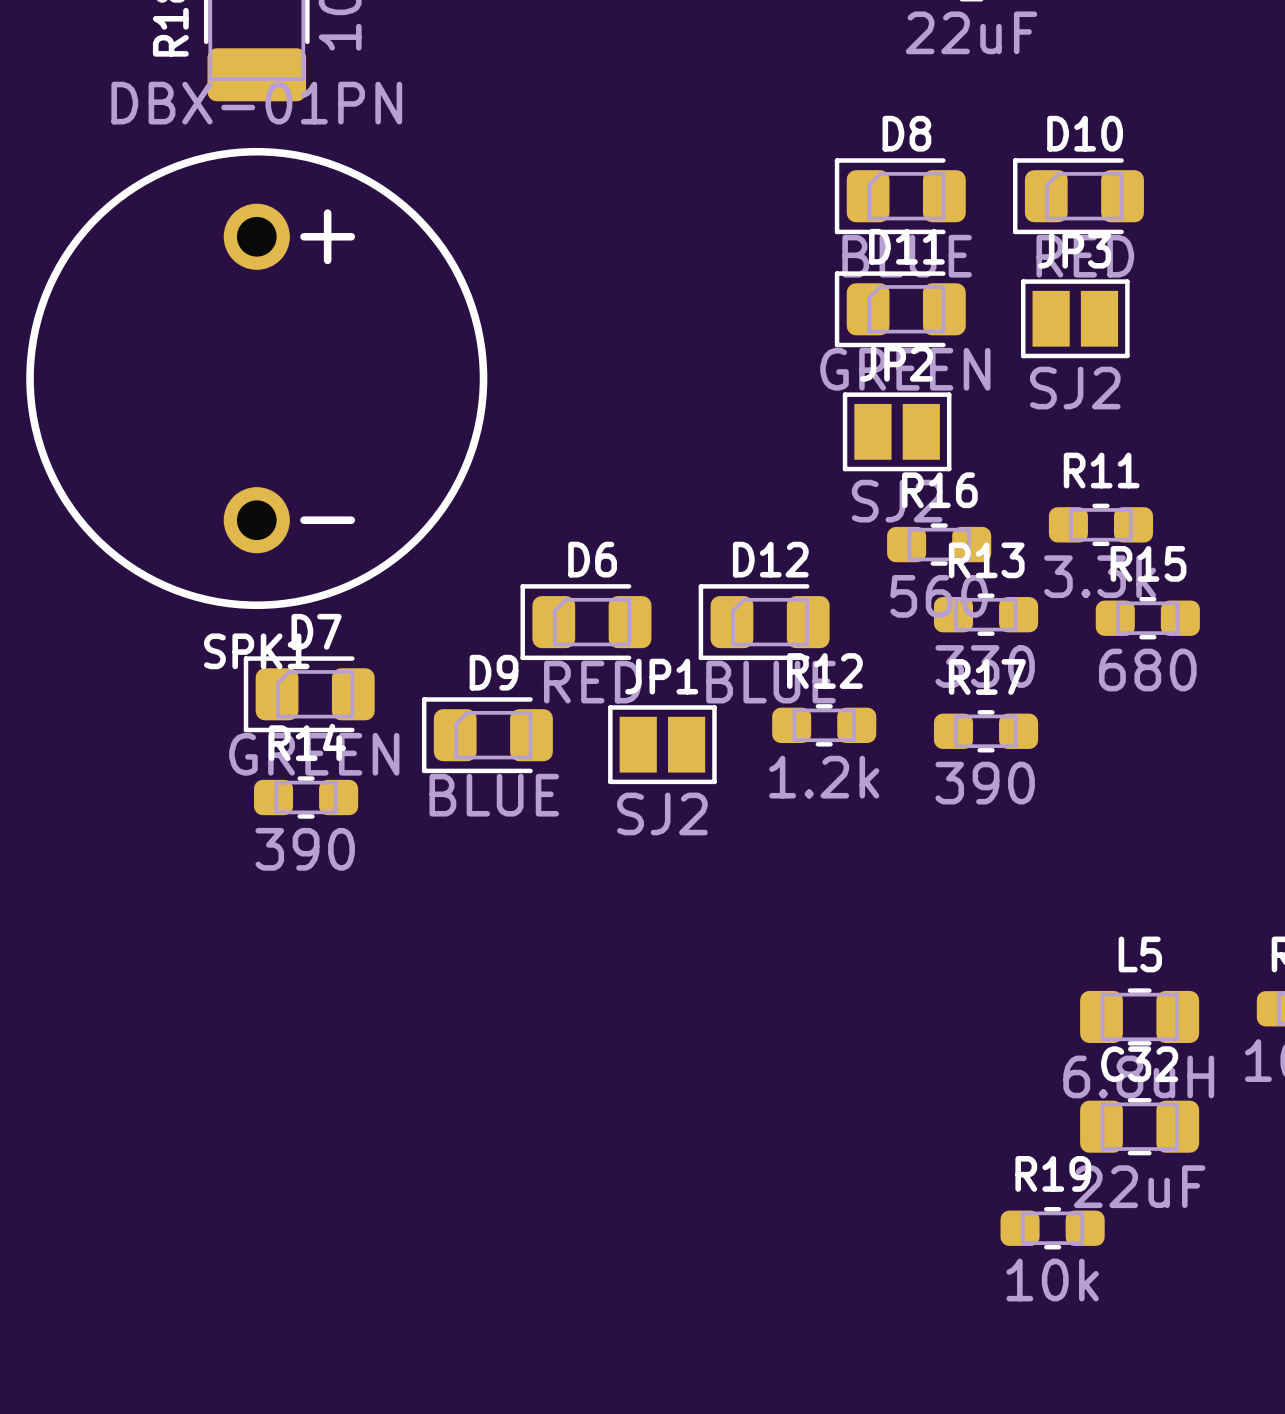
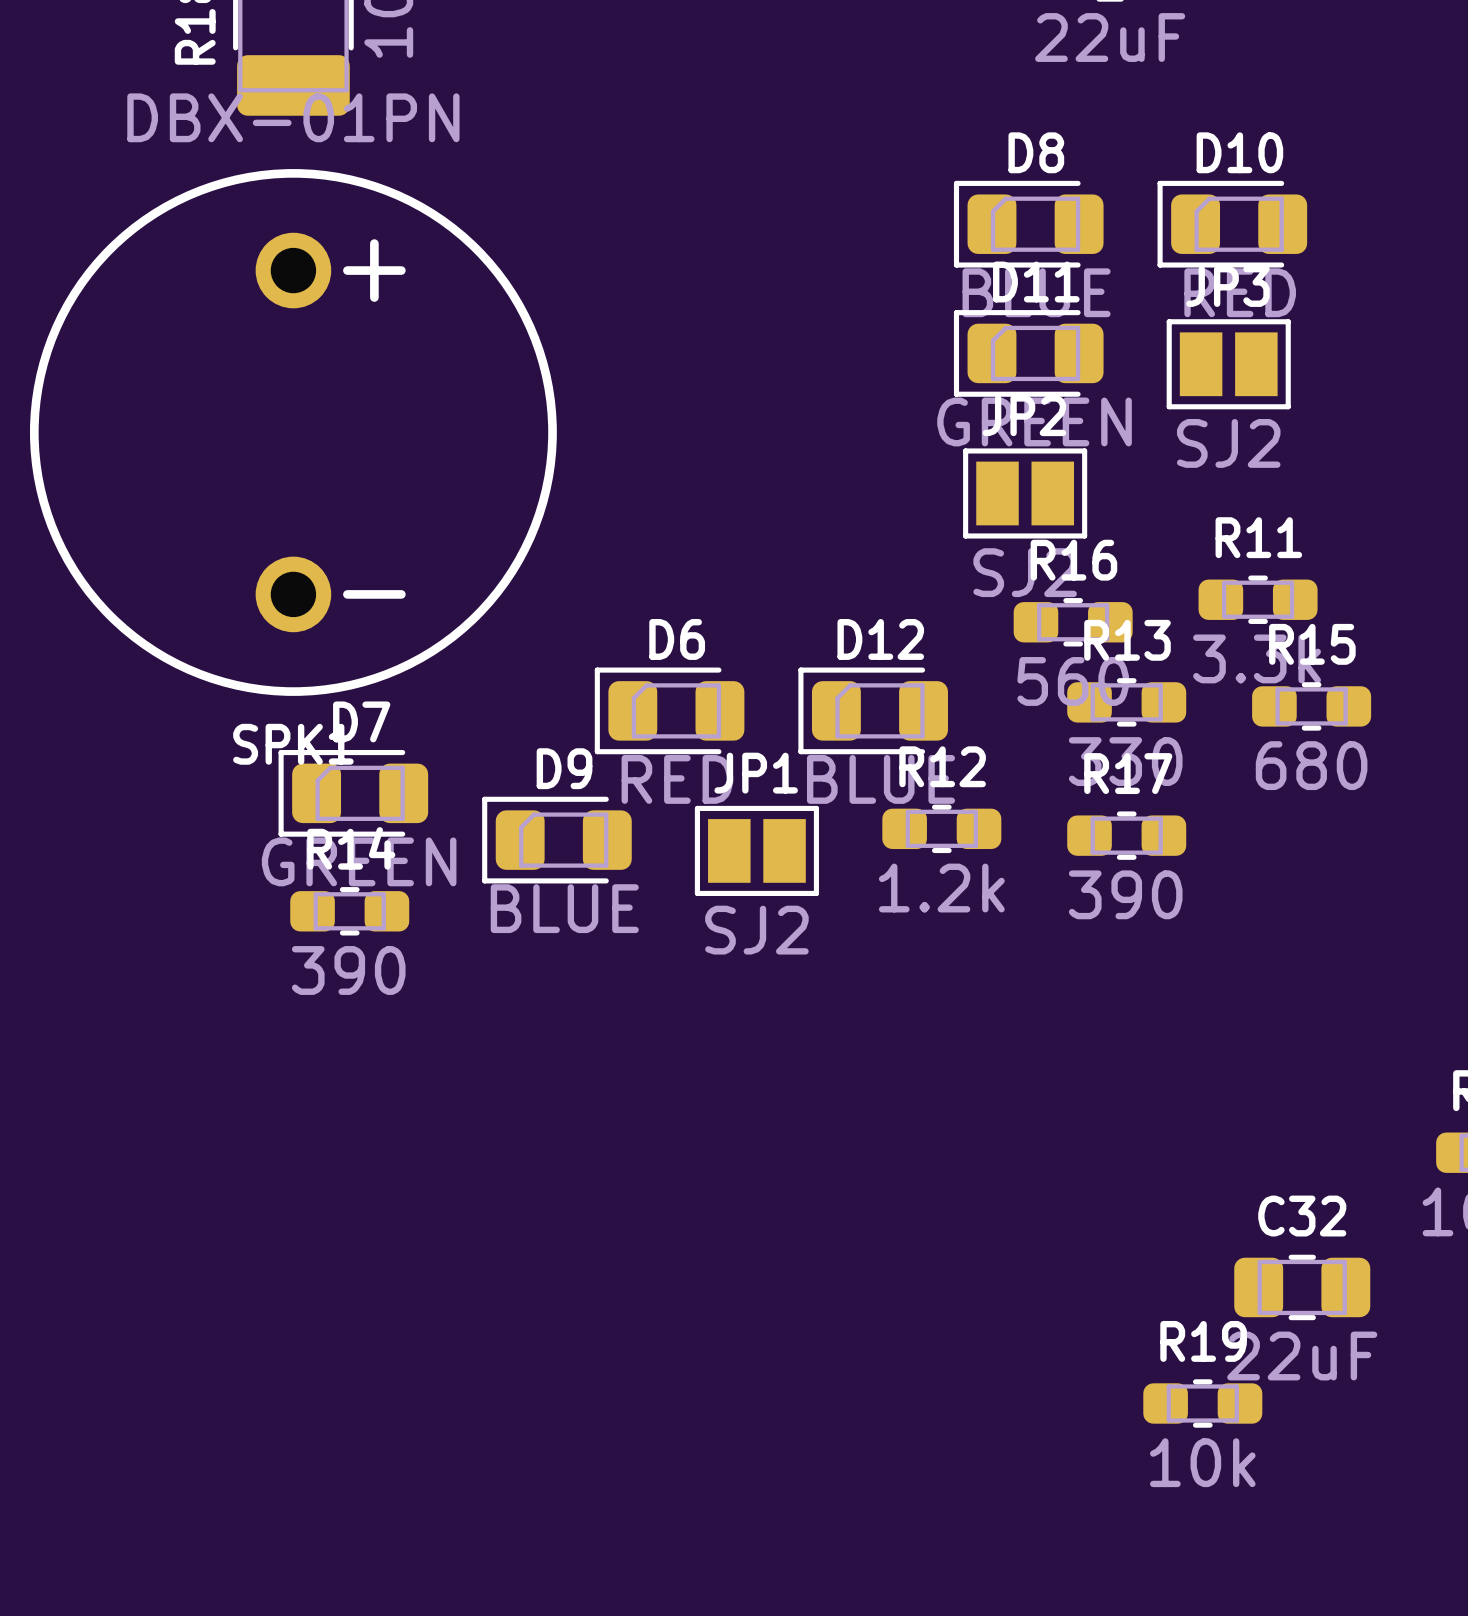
L5: 6.8uH (1139, 1016) -> none

